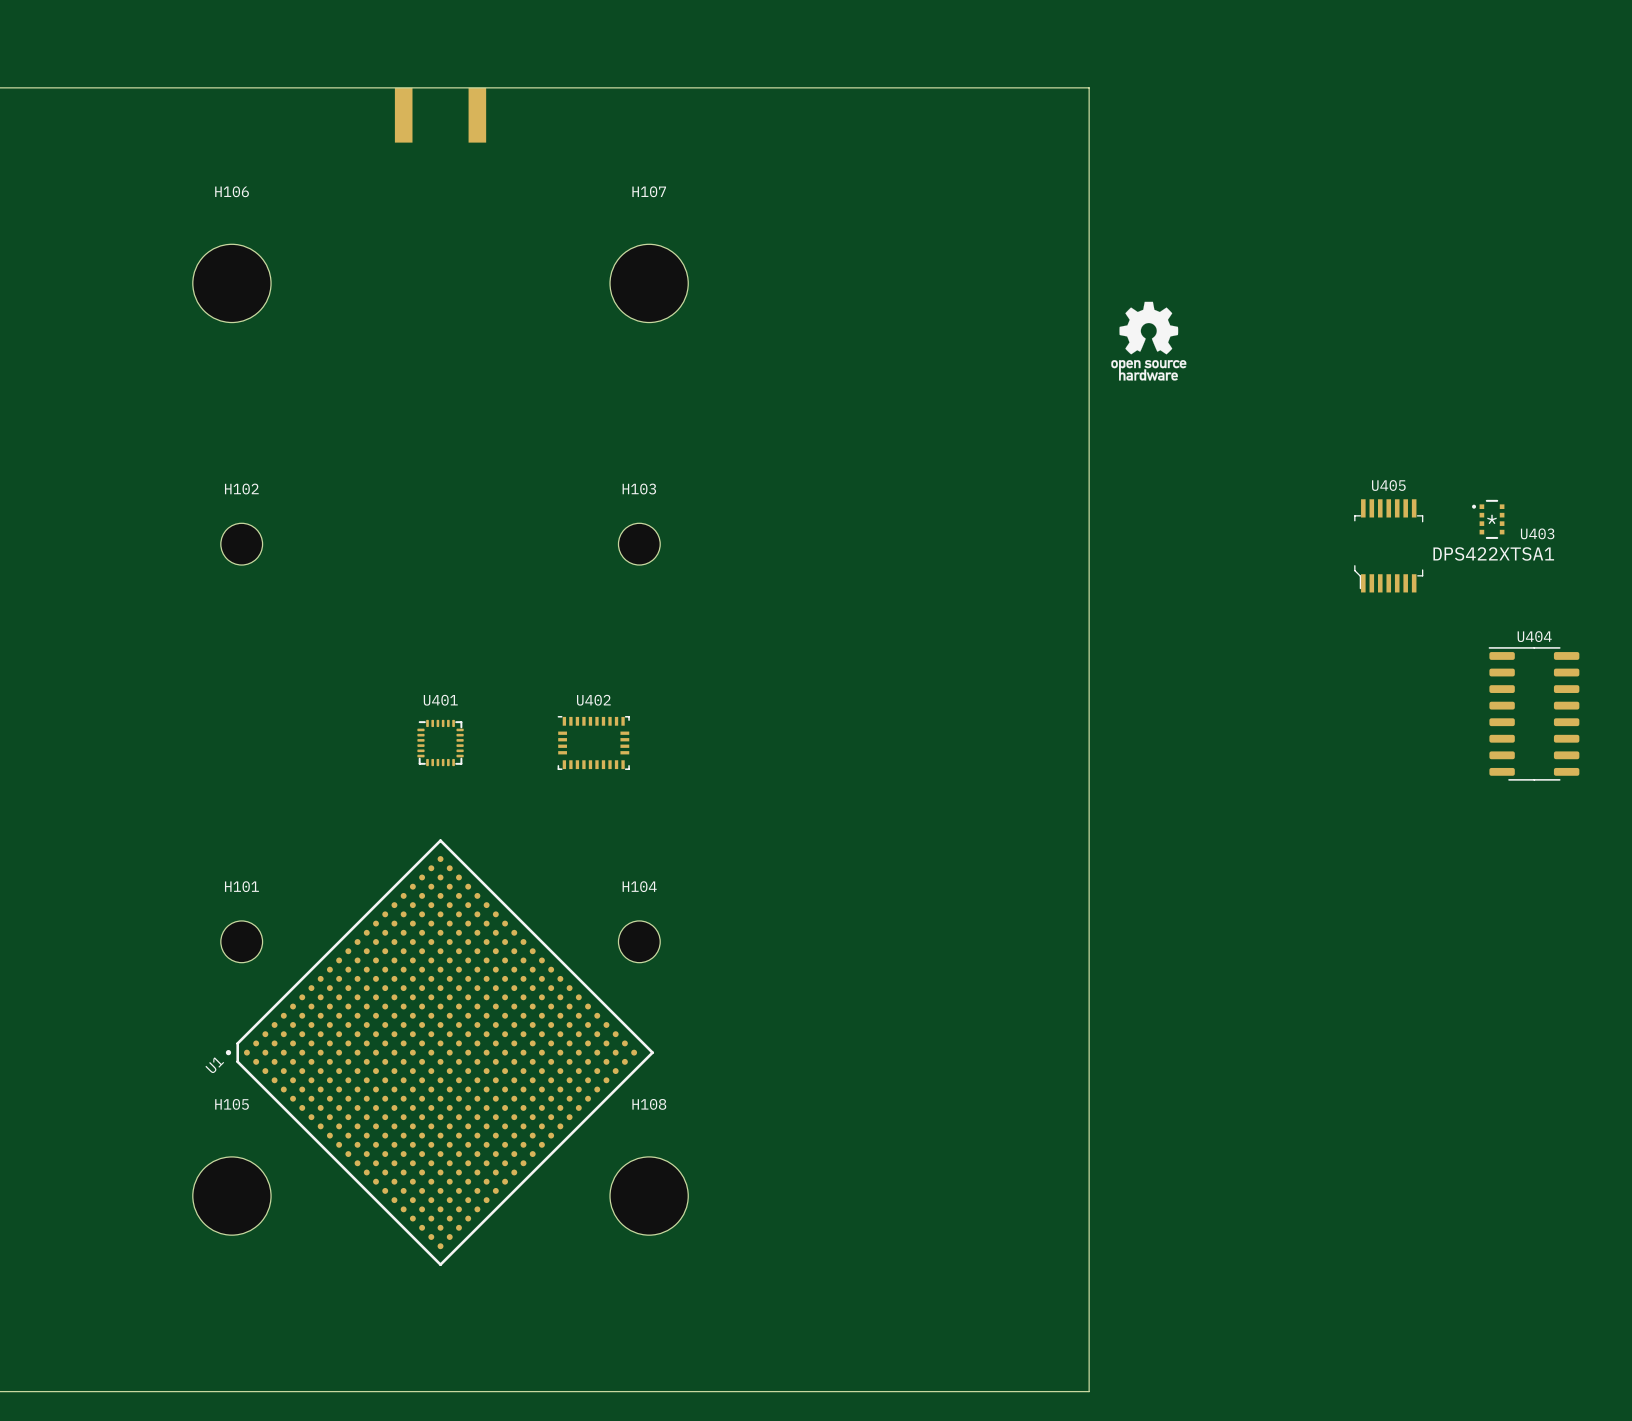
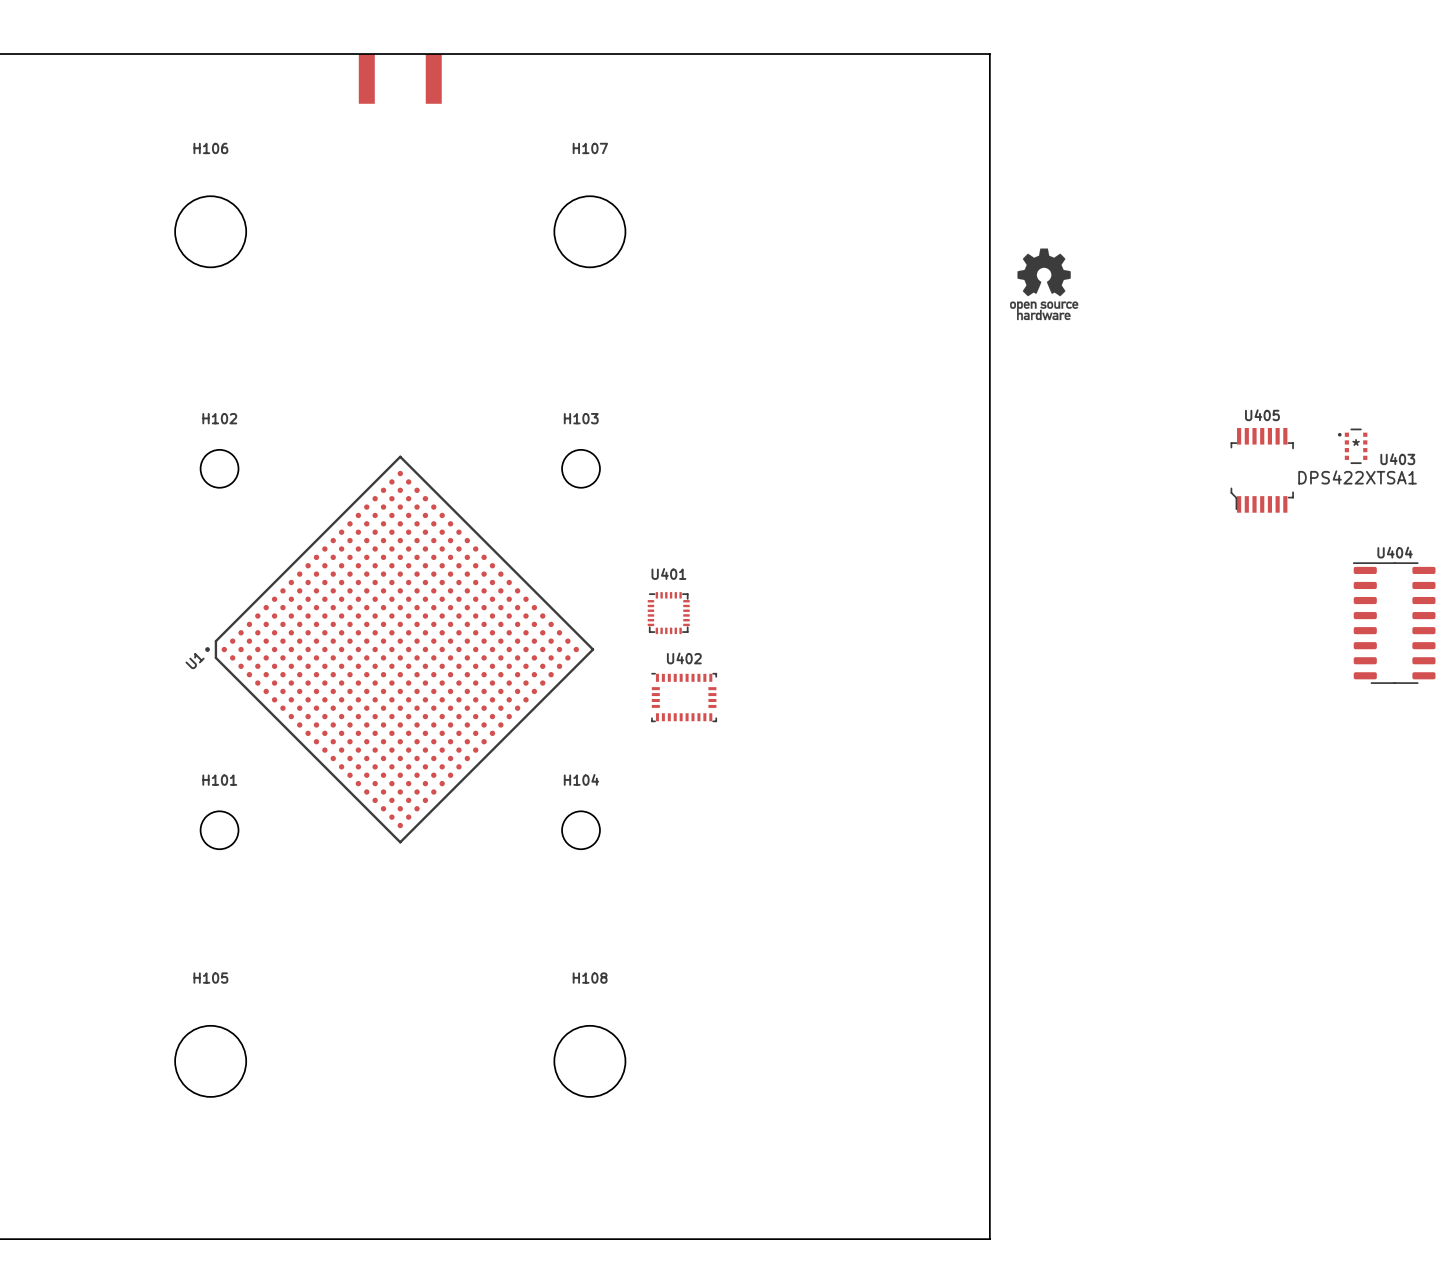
U401 position: (440, 742) -> (668, 613)
U402 position: (593, 742) -> (684, 697)
U1 position: (439, 1052) -> (399, 649)

